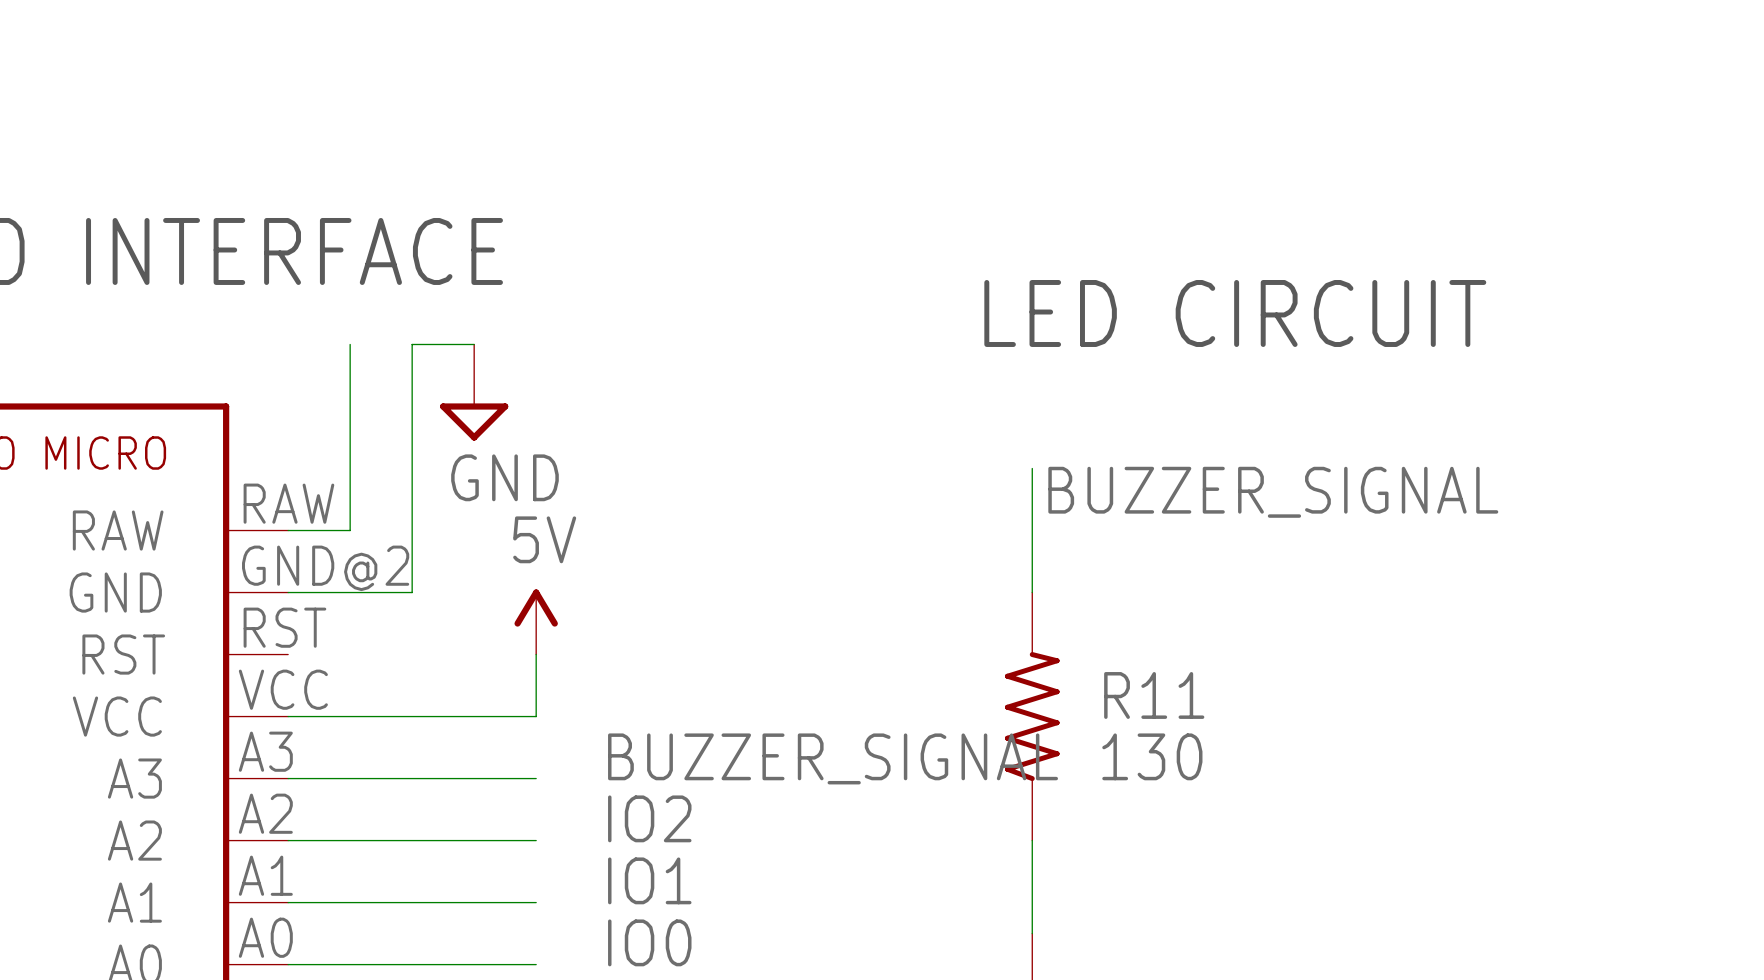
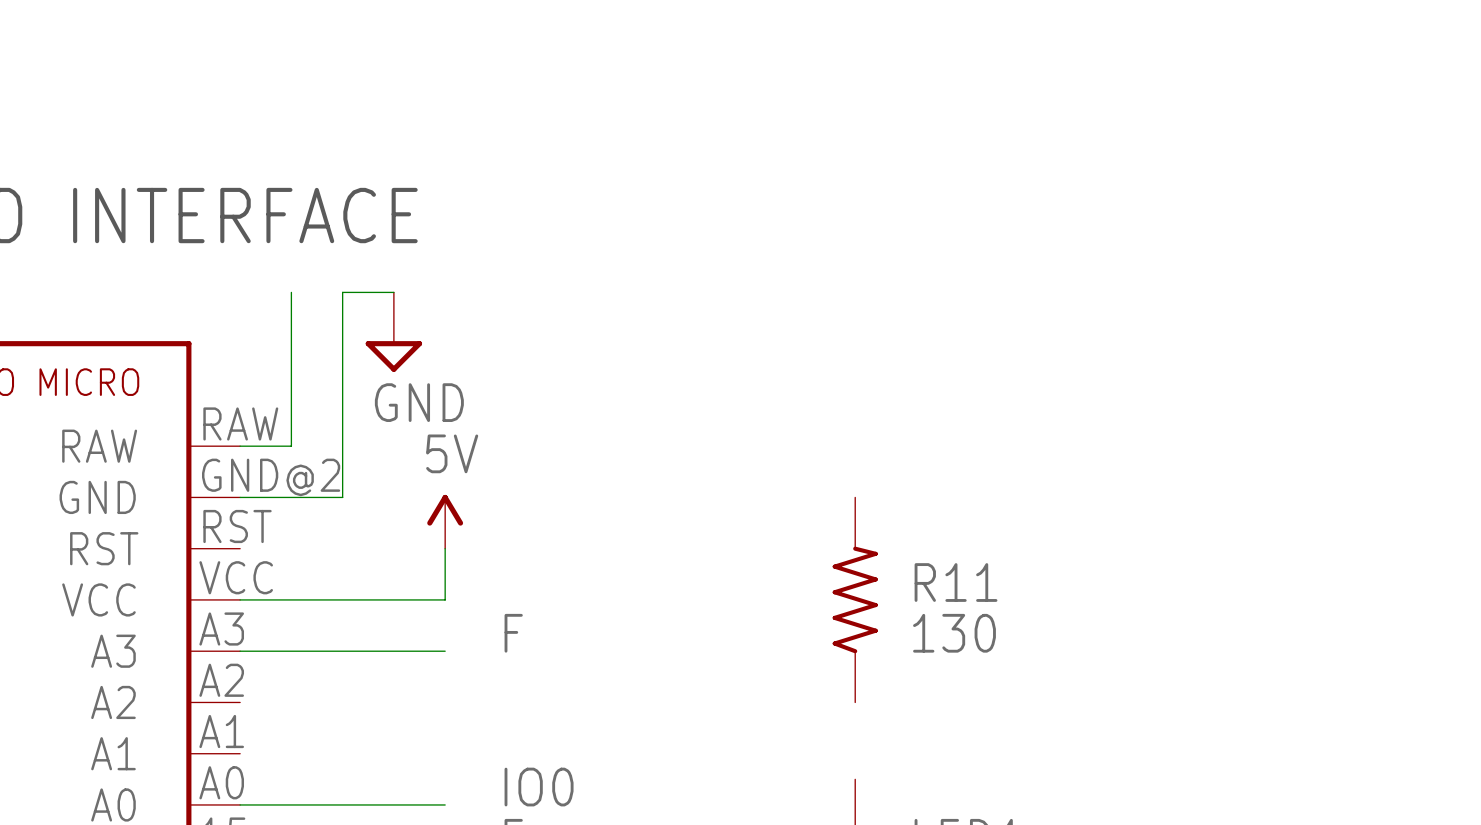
text: LED CIRCUIT (1235, 313) -> none
wire: (1032, 468) (1032, 592) -> none
label: BUZZER_SIGNAL (1273, 492) -> none
label: BUZZER_SIGNAL (833, 758) -> F (513, 633)
label: IO2 (649, 818) -> none
wire: (288, 840) (536, 840) -> none
wire: (1032, 840) (1032, 933) -> none
label: IO1 (649, 880) -> none
wire: (288, 902) (536, 902) -> none

